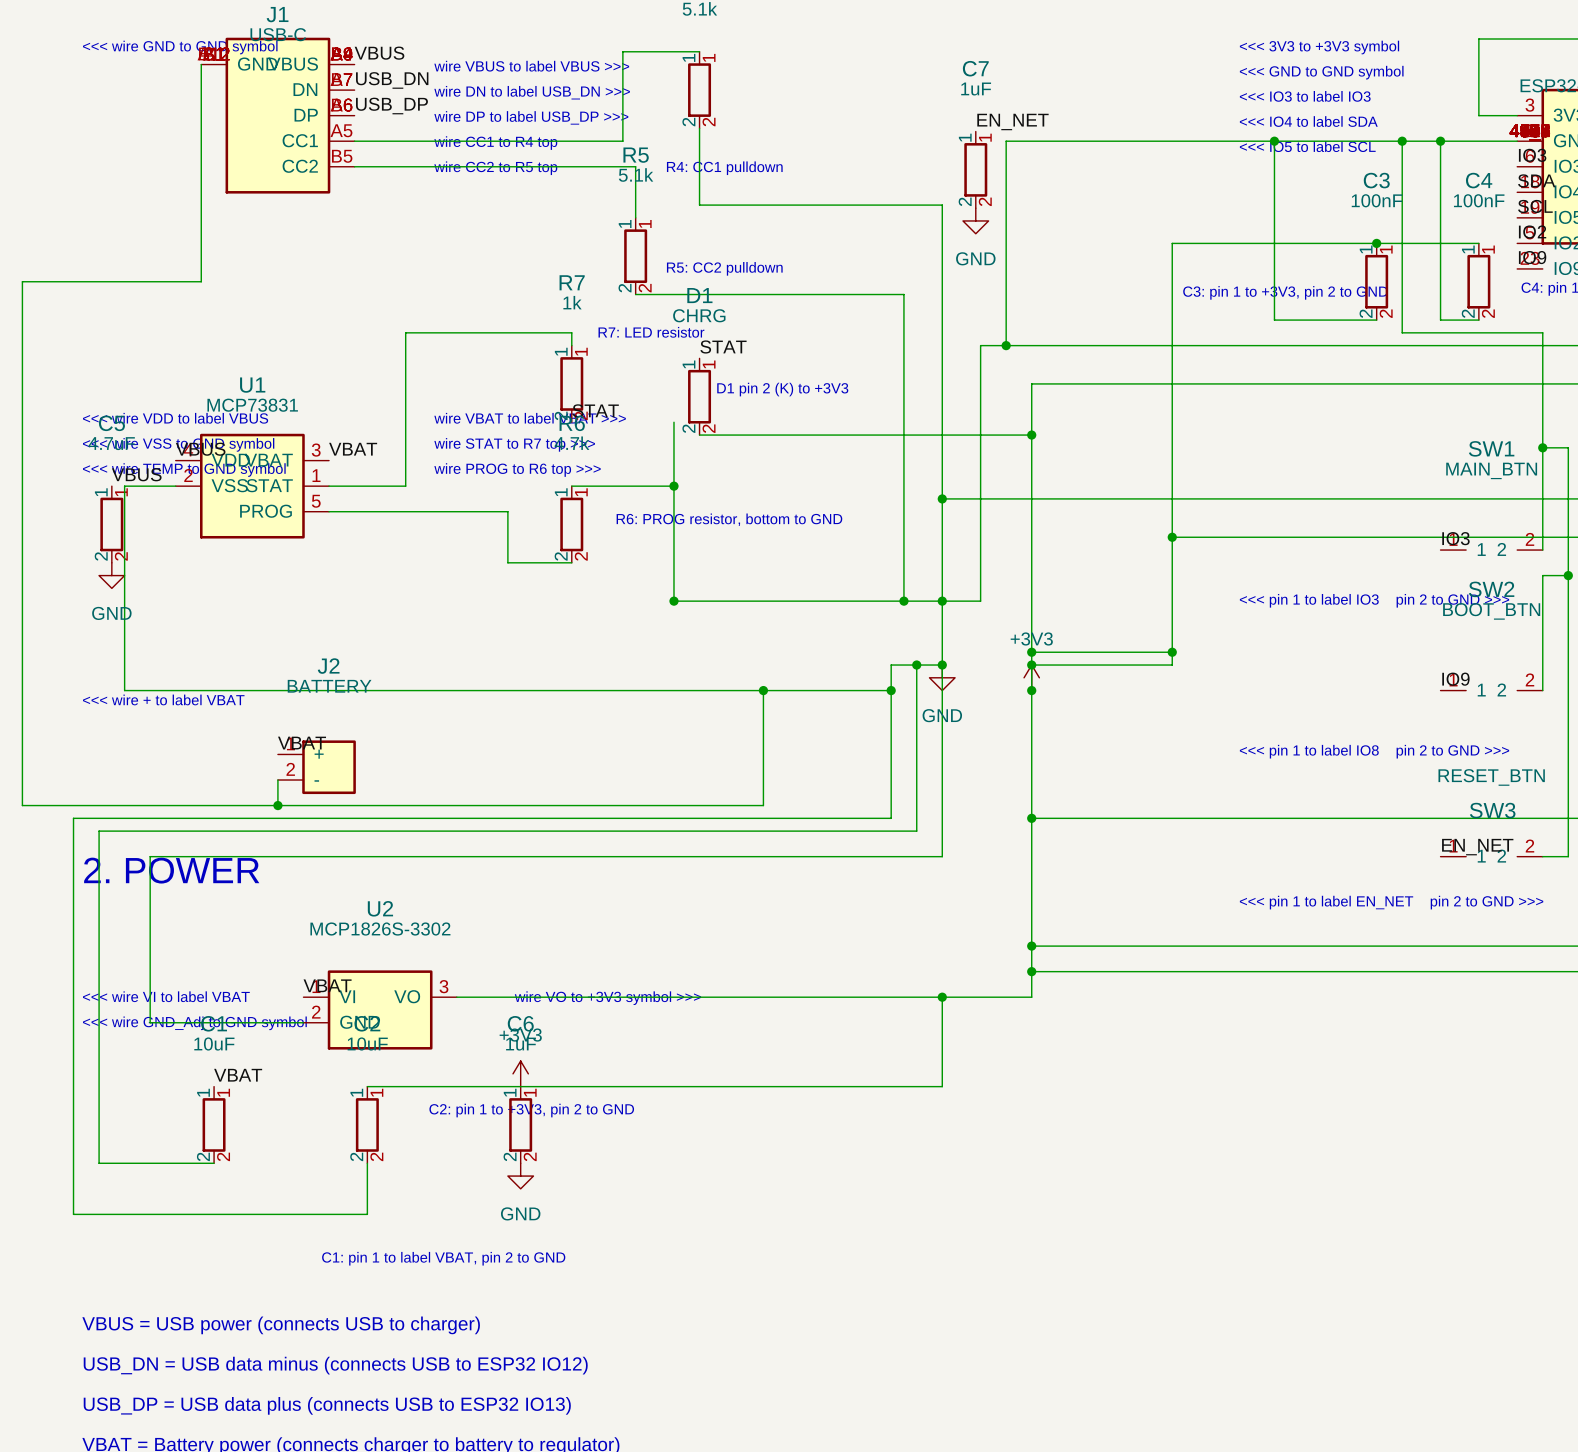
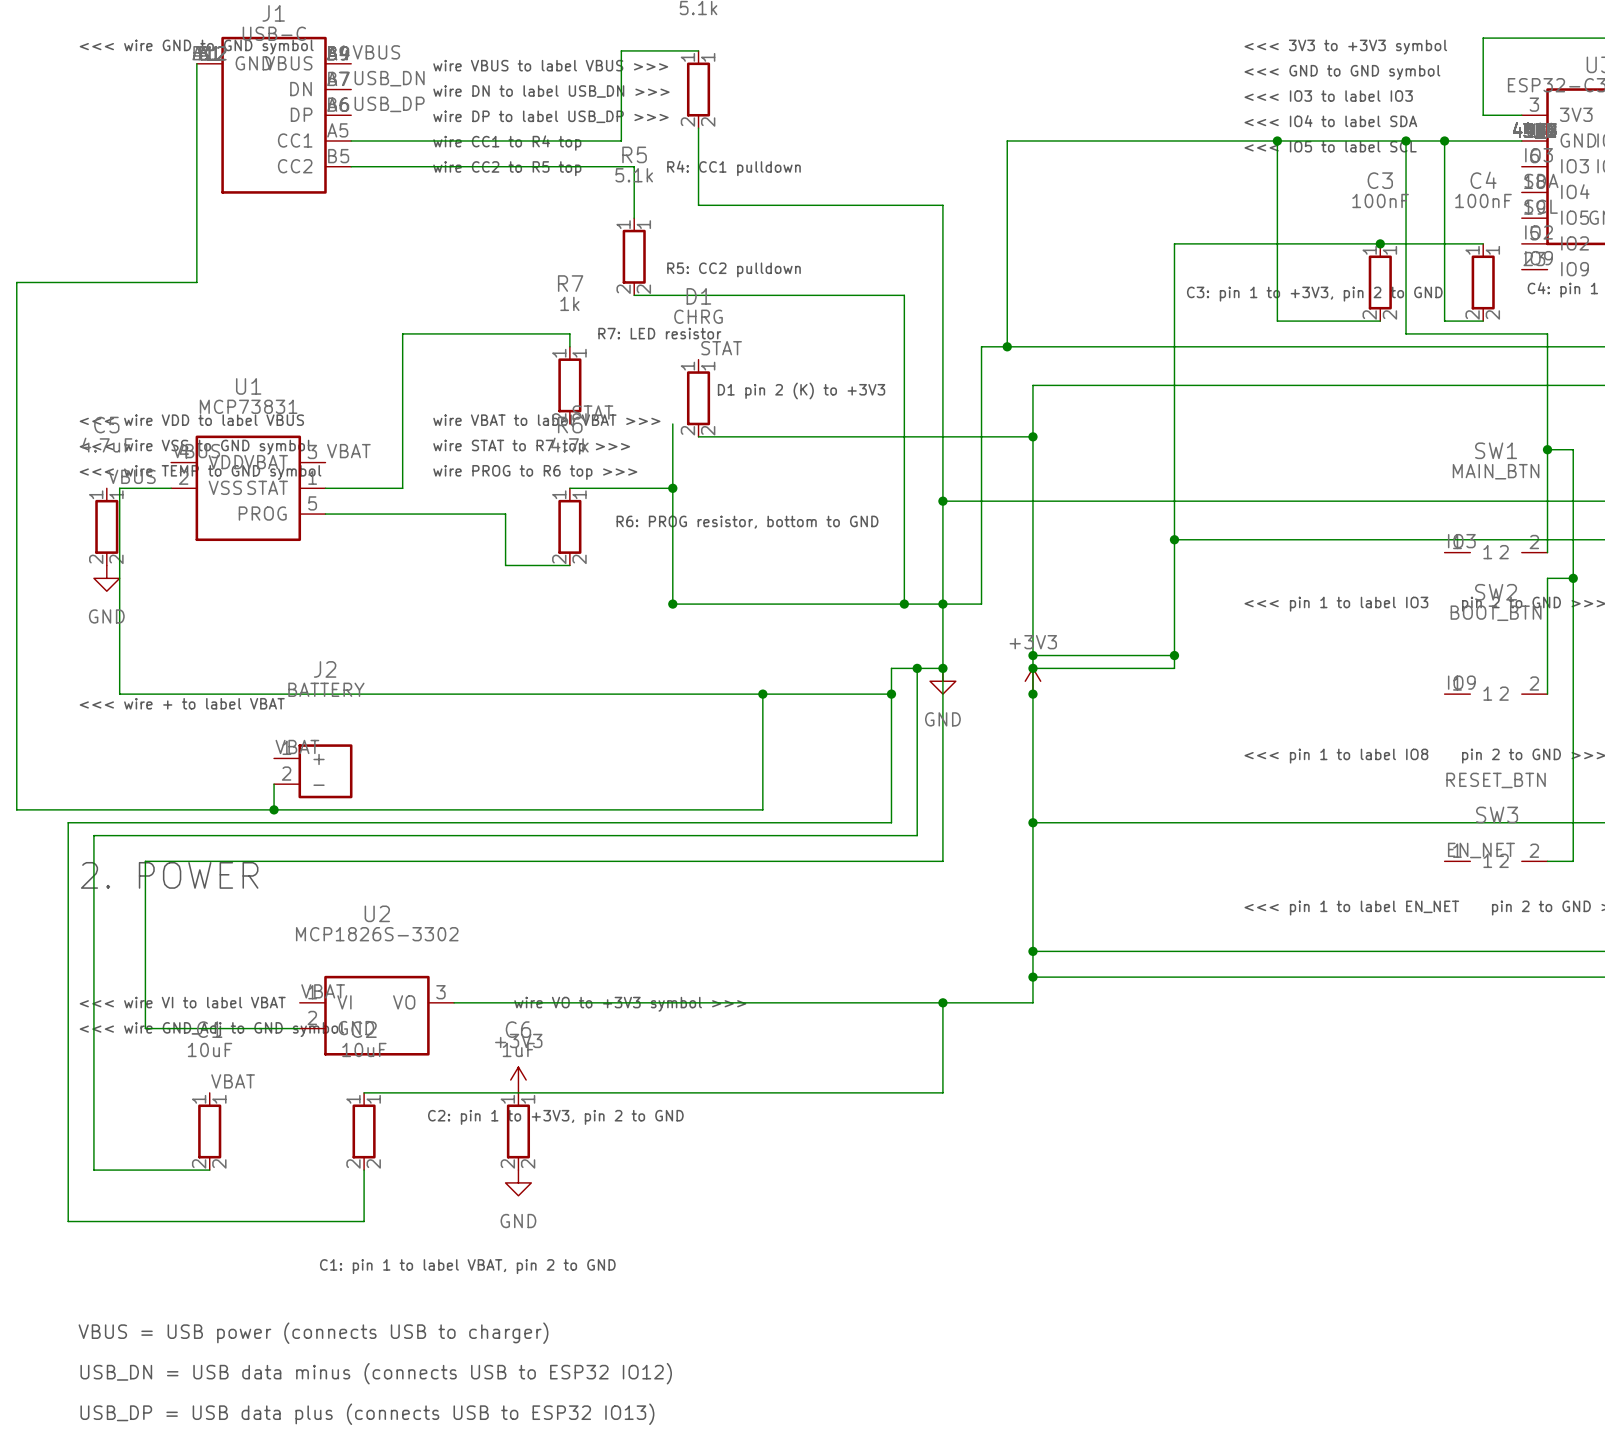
label: EN_NET (1012, 121) -> none
C7: 1uF (975, 169) -> none
power symbol: GND (975, 220) -> none

